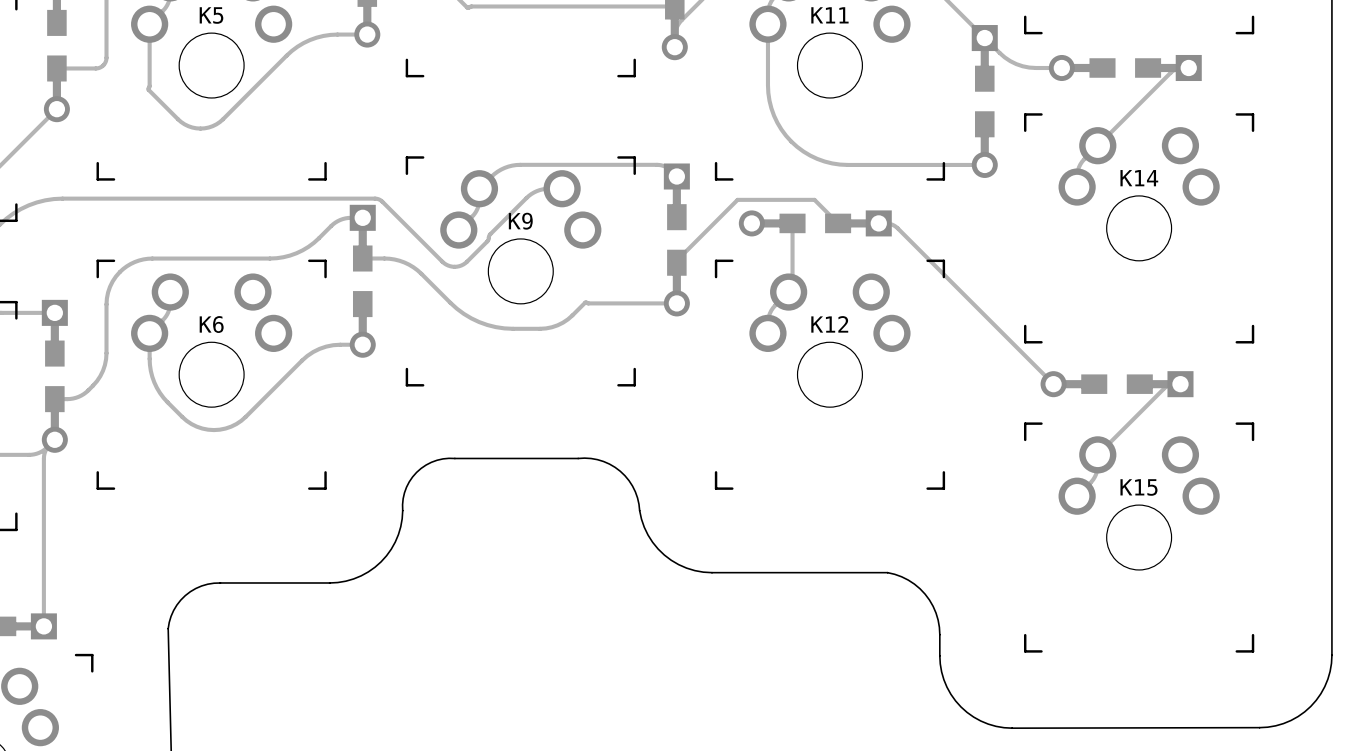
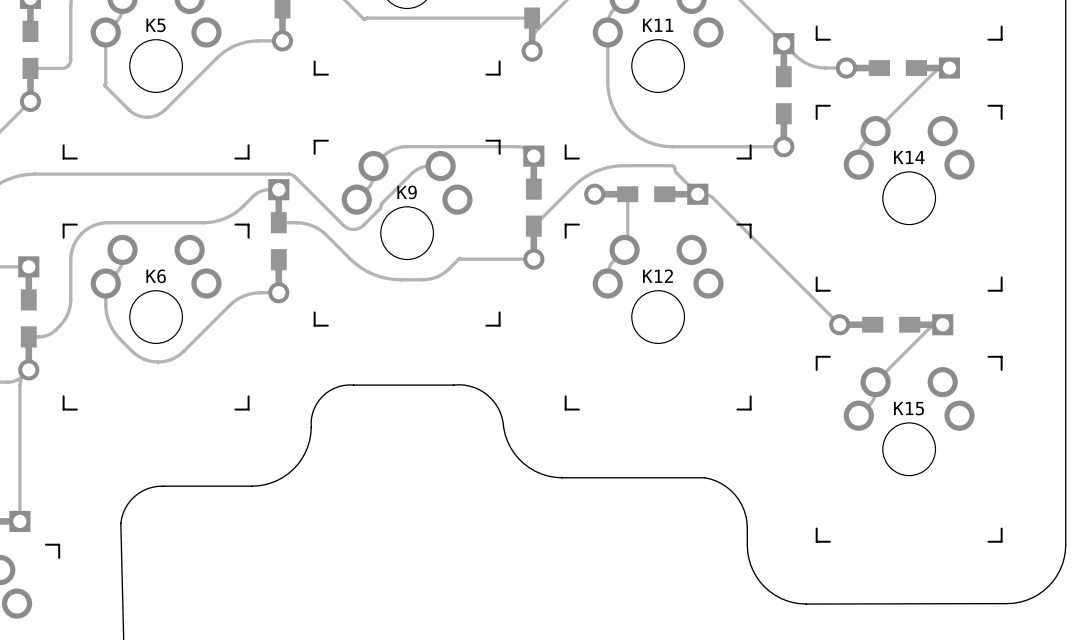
track: (838, 223) (814, 199) (737, 199) (676, 262) -> (697, 194) (676, 172) (672, 165) (610, 167) (596, 171) (578, 182) (533, 226)

